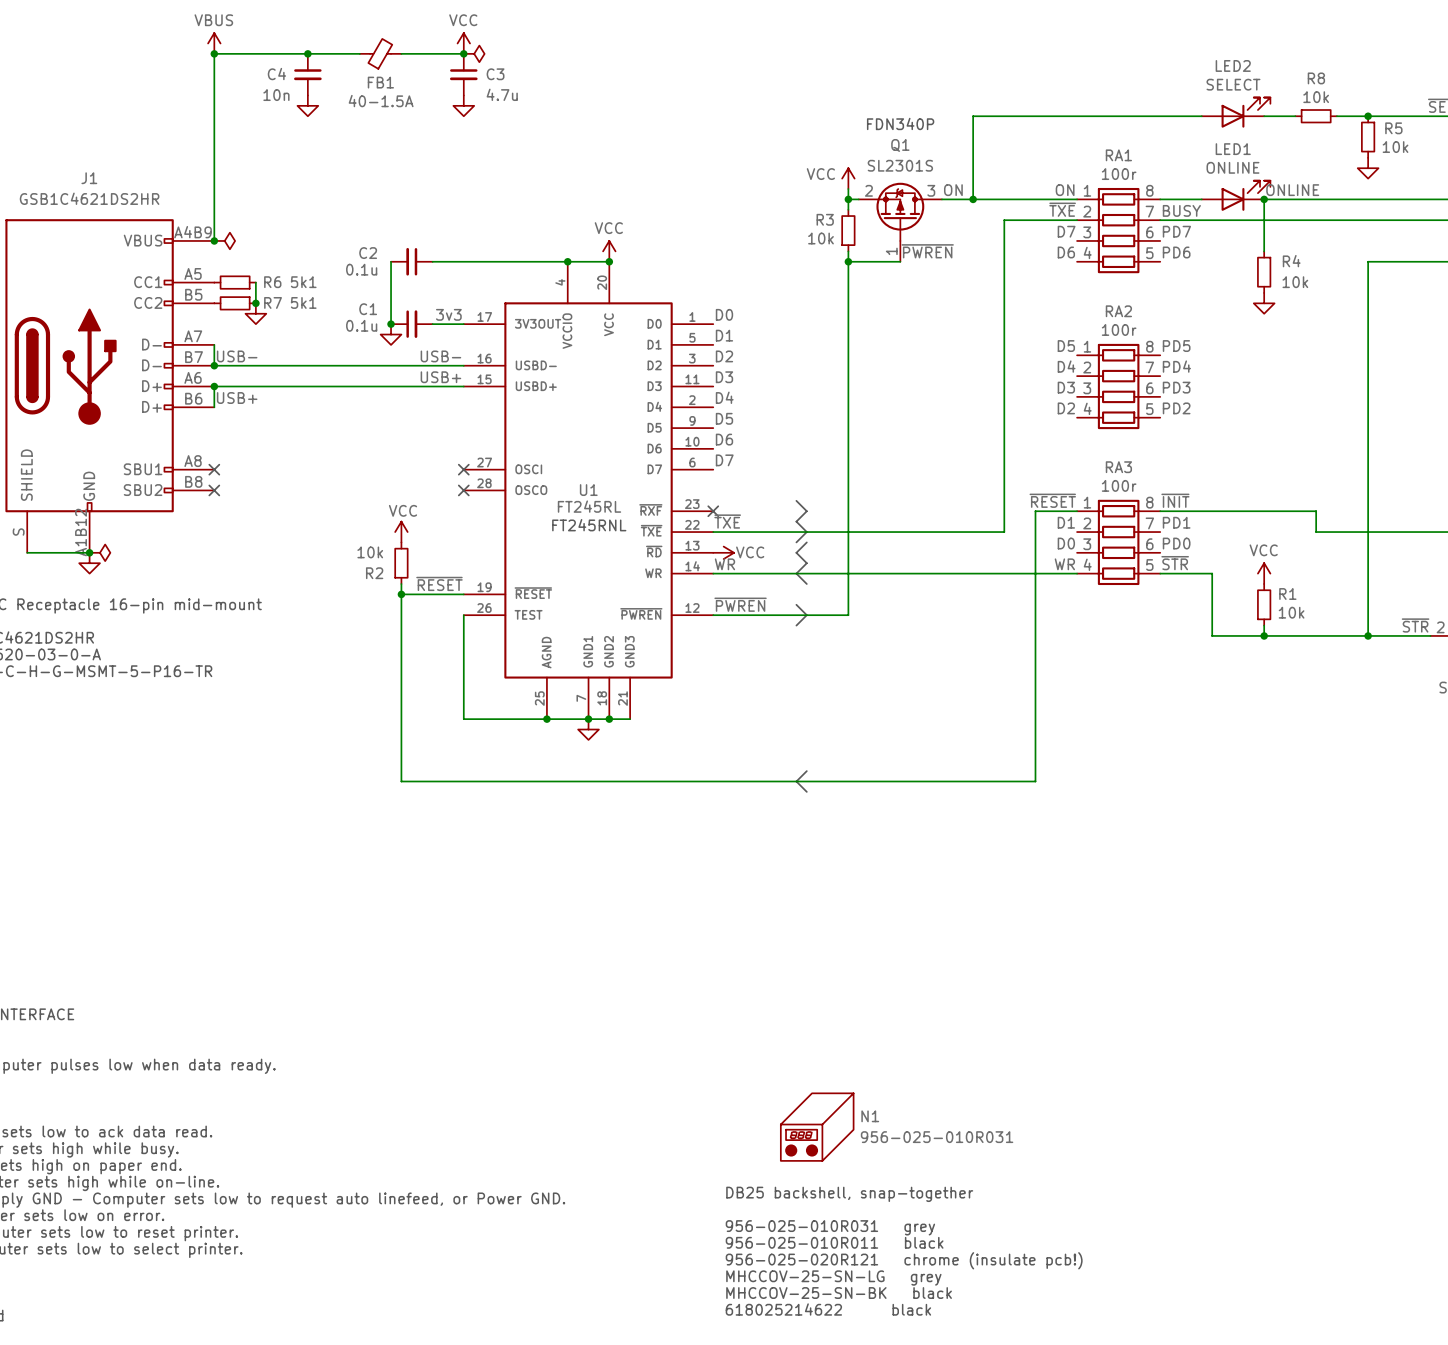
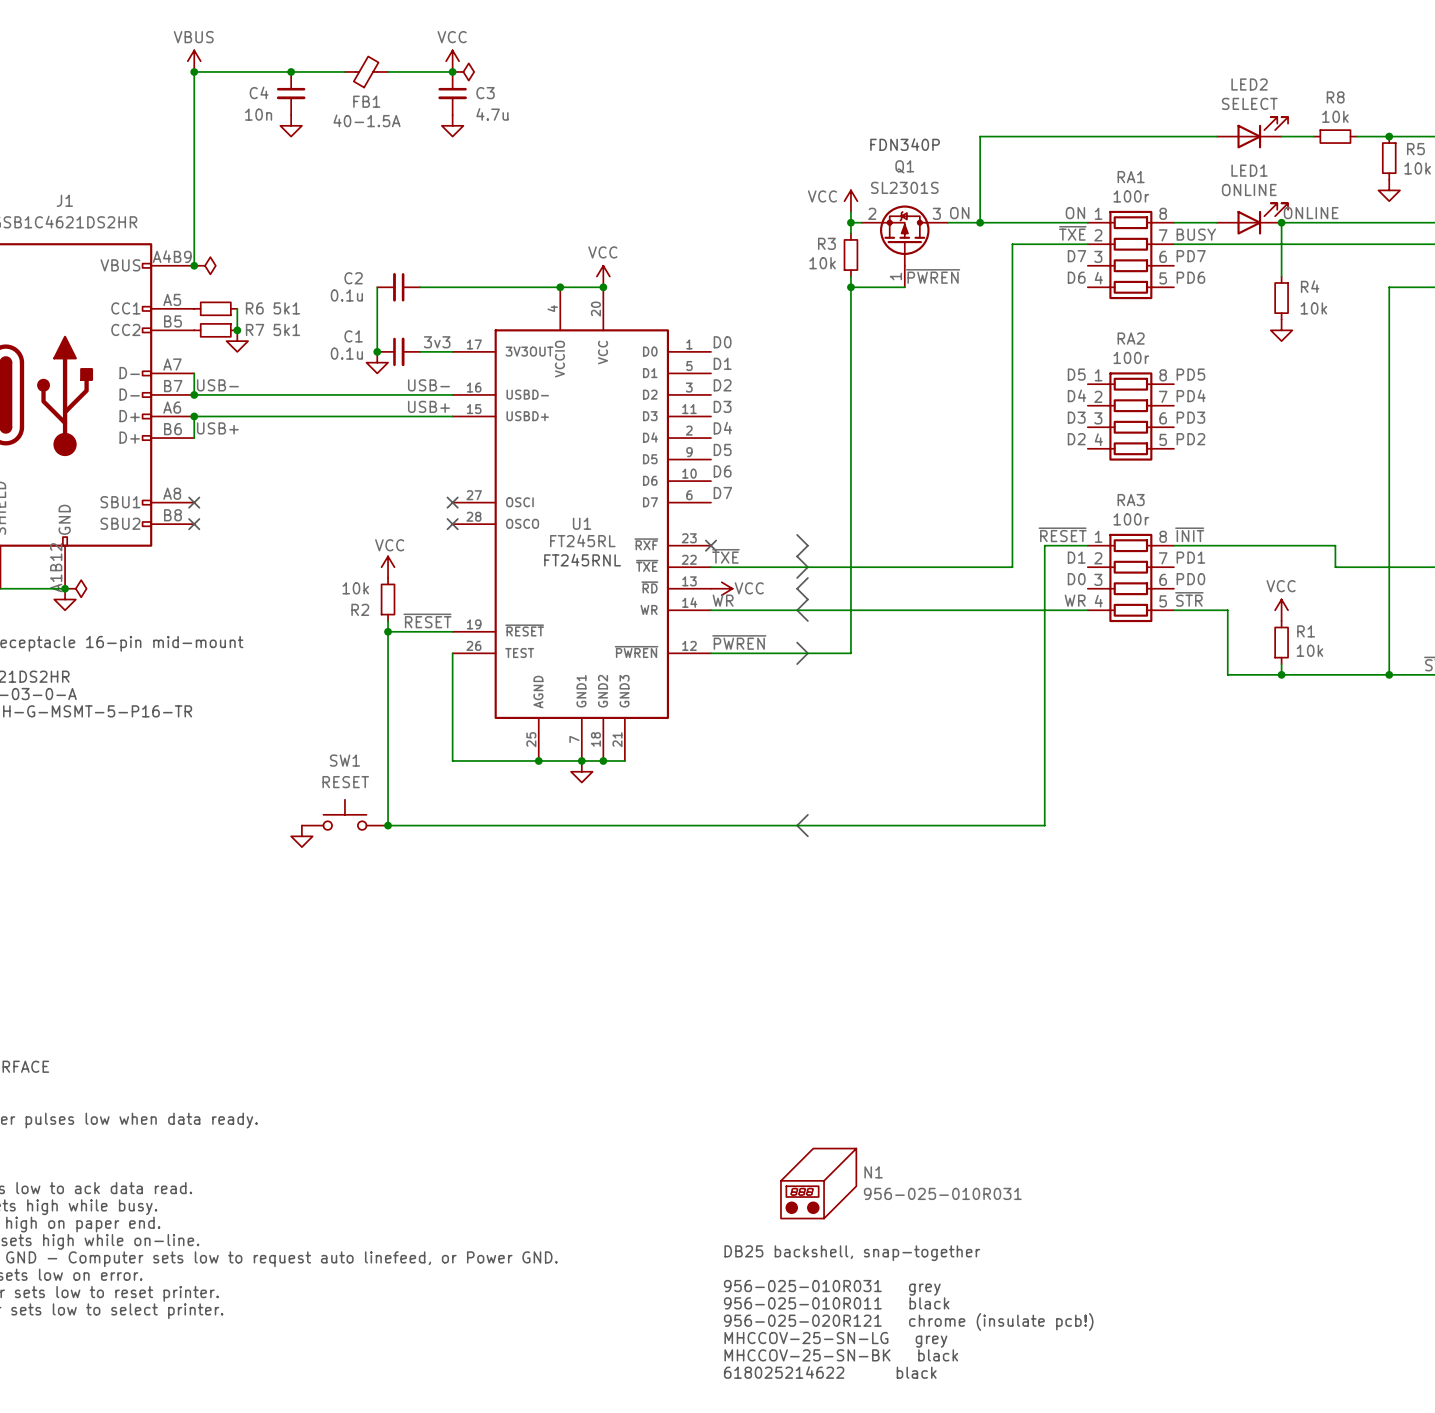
SW1: none -> RESET (344, 814)
junction: none -> (388, 825)
power symbol: none -> (301, 836)

